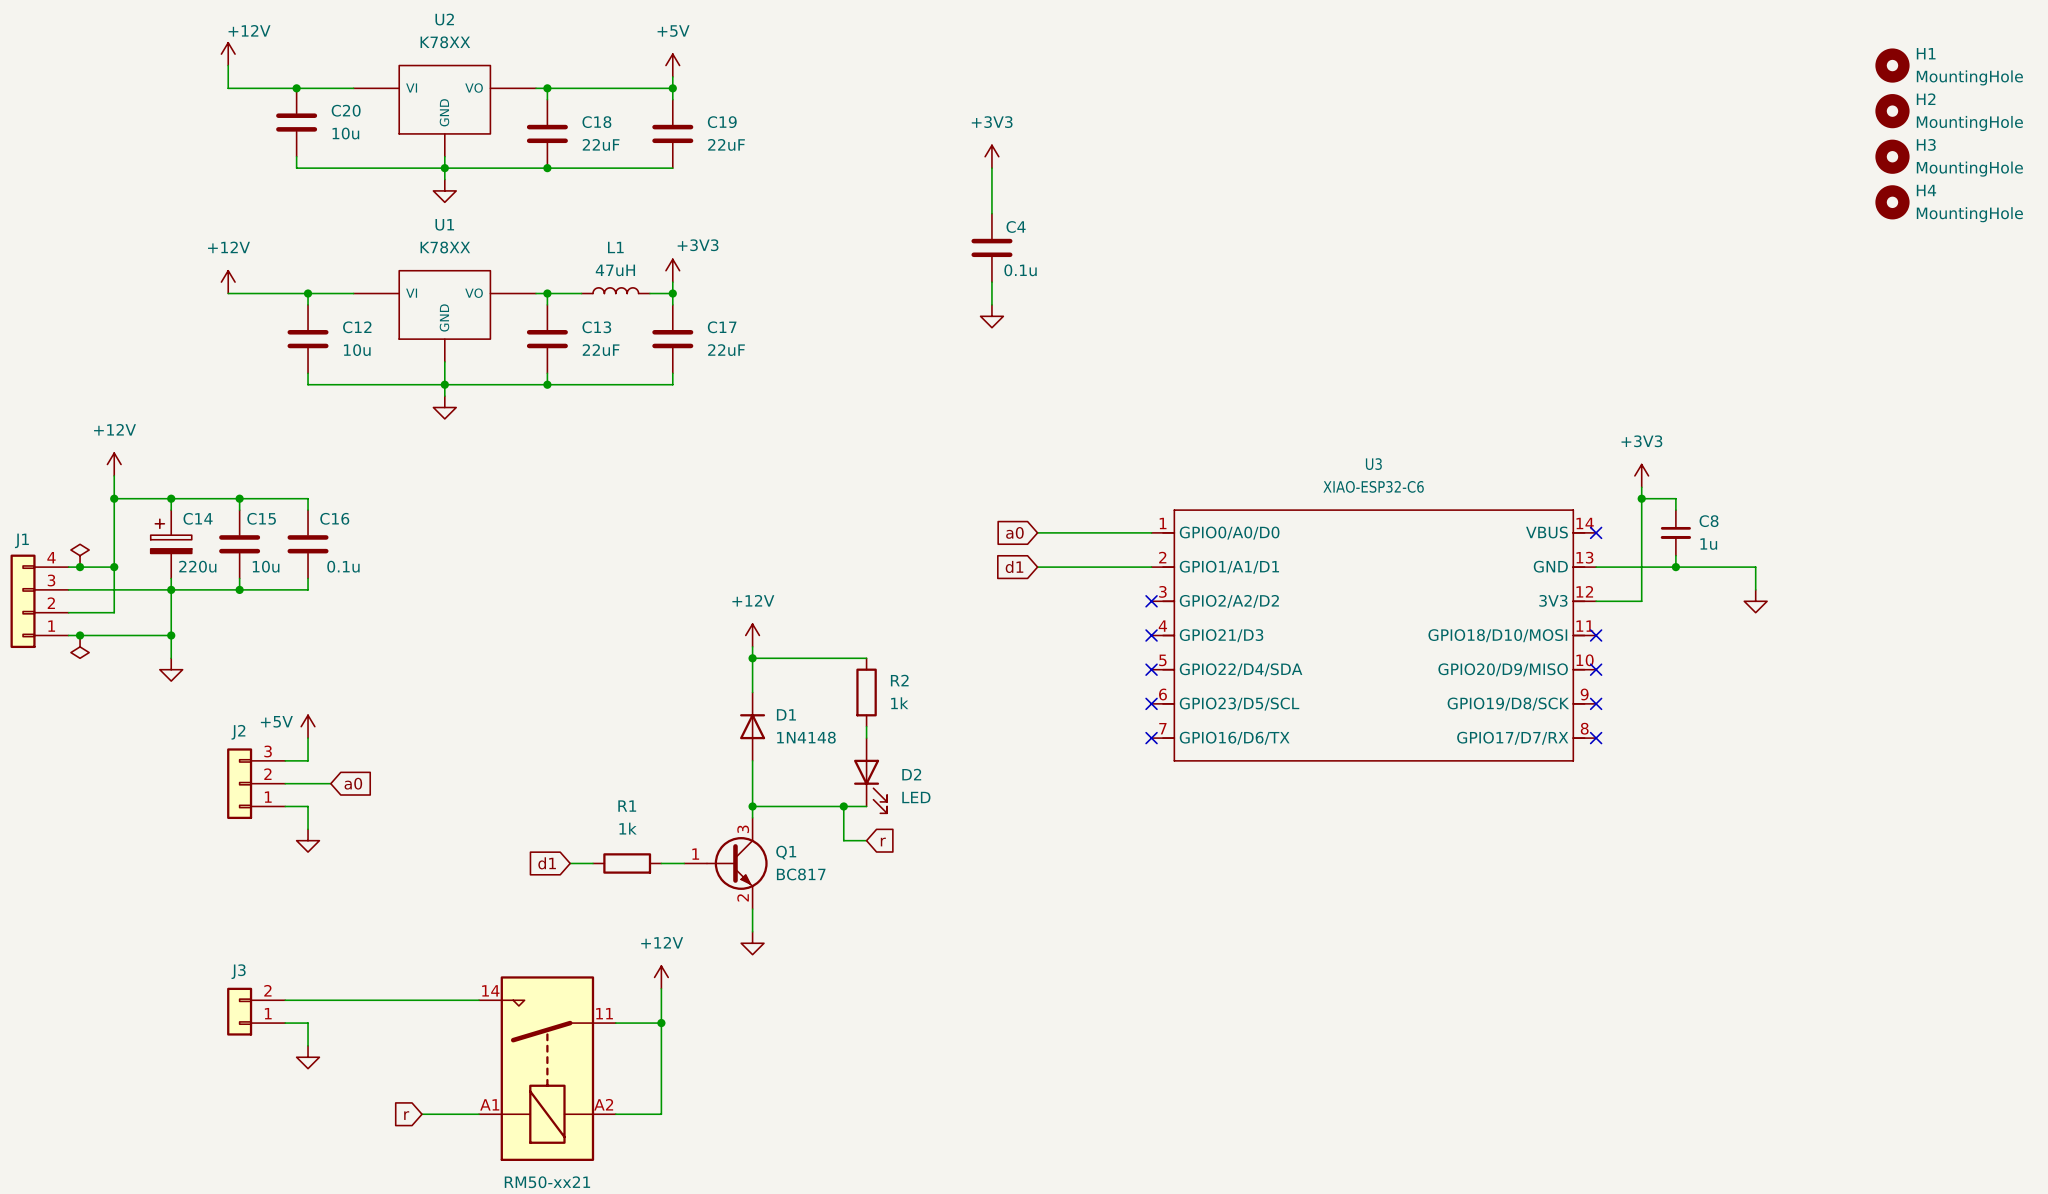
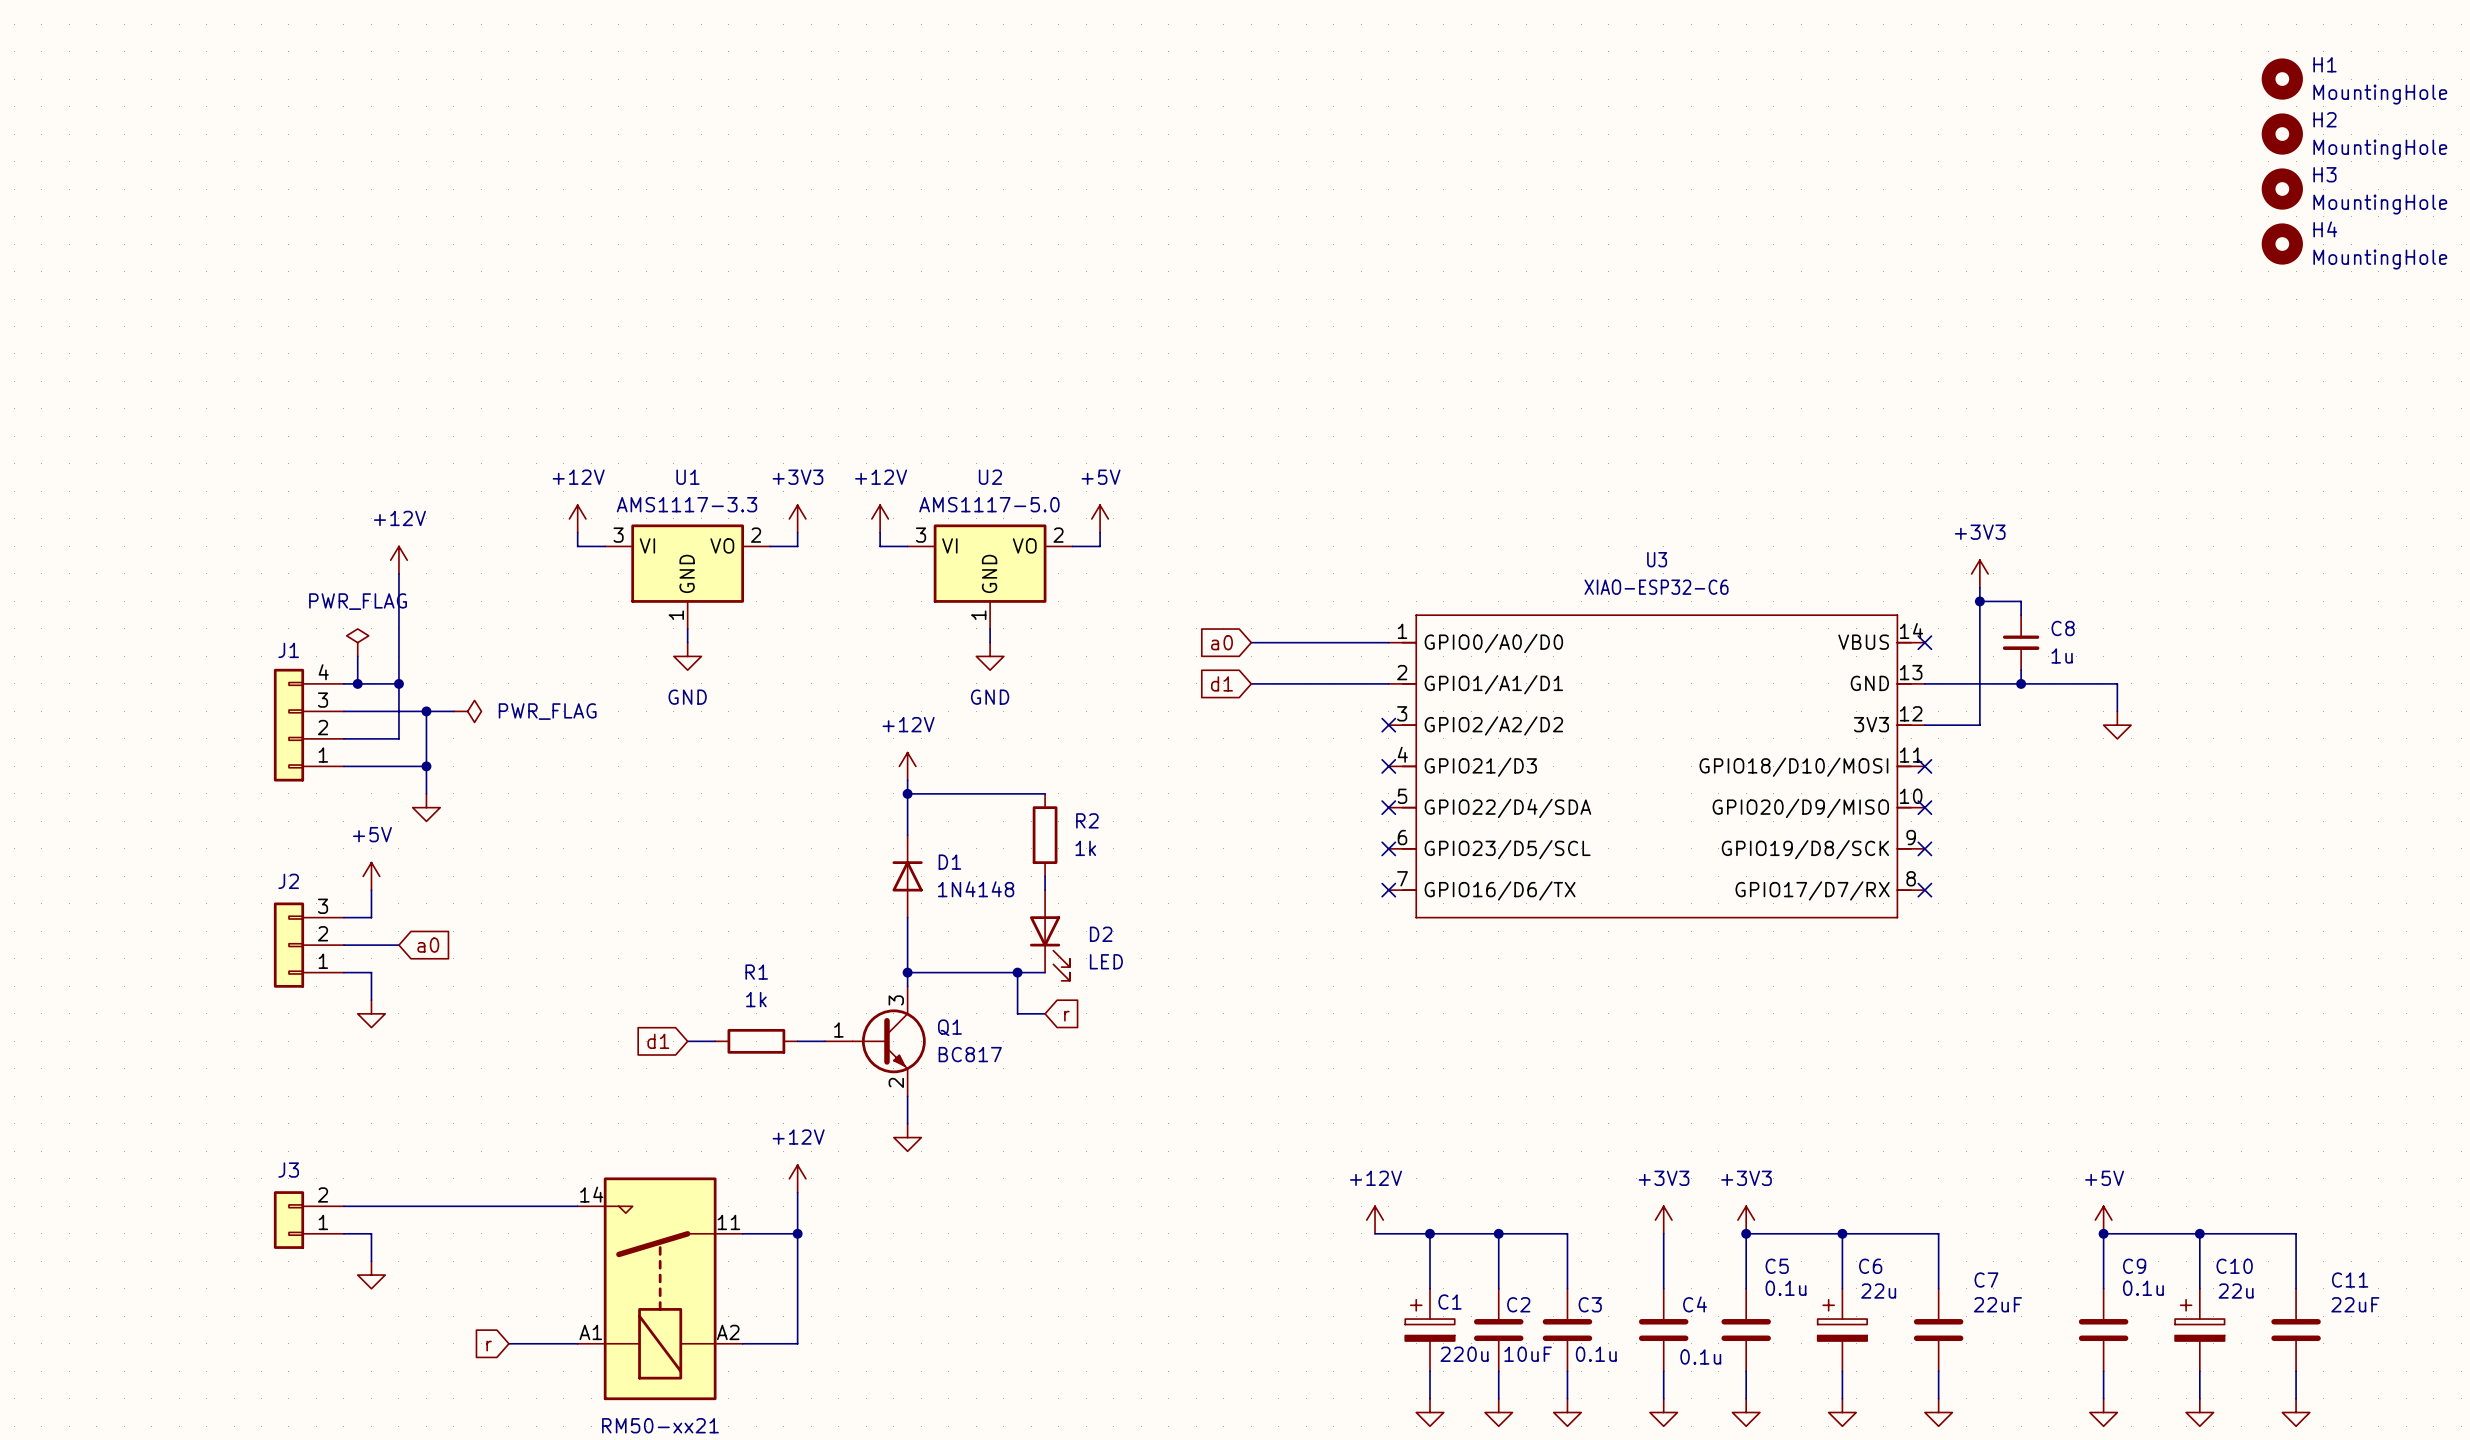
U2 value: K78XX (445, 42) -> AMS1117-5.0 (989, 504)
power symbol: +12V (228, 54) -> none
wire: (228, 65) (228, 88) (353, 88) -> none
U2 symbol: [353, 65, 537, 157] -> [907, 524, 1073, 629]
power symbol: +5V (672, 65) -> none
wire: (672, 76) (672, 99) -> none
junction: (296, 88) -> none
wire: (536, 88) (672, 88) -> none
wire: (547, 88) (547, 99) -> none
junction: (547, 88) -> none
junction: (672, 88) -> none
C20: 10u (296, 122) -> none
C18: 22uF (547, 133) -> none
C19: 22uF (672, 133) -> none
wire: (296, 156) (296, 168) (672, 168) -> none
wire: (444, 156) (444, 179) -> none
power symbol: +3V3 (991, 156) -> none
junction: (444, 168) -> none
junction: (547, 168) -> none
wire: (991, 168) (991, 213) -> none
power symbol: (444, 190) -> none
power symbol text position: +3V3 (698, 245) -> +3V3 (797, 477)
U1 value: K78XX (445, 247) -> AMS1117-3.3 (687, 504)
C4 position: (991, 247) -> (1663, 1330)
U1 symbol: [353, 270, 537, 362] -> [605, 524, 771, 629]
power symbol position: +3V3 (672, 270) -> +3V3 (797, 518)
power symbol: +12V (228, 282) -> none
wire: (672, 282) (672, 304) -> none
wire: (991, 282) (991, 304) -> none
L1: 47uH (615, 290) -> none
wire: (228, 293) (353, 293) -> none
wire: (308, 293) (308, 304) -> none
junction: (308, 293) -> none
wire: (536, 293) (581, 293) -> none
wire: (547, 293) (547, 304) -> none
junction: (547, 293) -> none
wire: (649, 293) (672, 293) -> none
junction: (672, 293) -> none
power symbol: (991, 316) -> none
C12: 10u (308, 339) -> none
C13: 22uF (547, 339) -> none
C17: 22uF (672, 339) -> none
wire: (444, 361) (444, 396) -> none
wire: (308, 373) (308, 384) (672, 384) (672, 373) -> none
wire: (547, 373) (547, 384) -> (687, 628) (687, 642)
junction: (444, 384) -> none
junction: (547, 384) -> none
power symbol: (444, 407) -> none
power symbol: none -> +12V (577, 518)
power symbol: none -> +12V (880, 518)
power symbol: none -> +5V (1100, 518)
wire: none -> (577, 532) (577, 546) (605, 546)
wire: none -> (797, 532) (797, 546) (770, 546)
wire: none -> (880, 532) (880, 546) (907, 546)
wire: none -> (1100, 532) (1100, 546) (1072, 546)
power symbol: +12V (114, 464) -> none
power symbol: none -> +12V (398, 560)
wire: (114, 475) (114, 612) (68, 612) -> (398, 573) (398, 738) (343, 738)
wire: (114, 498) (308, 498) (308, 510) -> none
junction: (114, 498) -> none
wire: (171, 498) (171, 510) -> none
junction: (171, 498) -> none
wire: (239, 498) (239, 510) -> none
junction: (239, 498) -> none
wire: none -> (990, 628) (990, 642)
power symbol: none -> PWR_FLAG (357, 642)
C14: 220u (171, 544) -> none
C15: 10u (239, 544) -> none
wire: none -> (357, 656) (357, 683)
C16: 0.1u (308, 544) -> none
power symbol: none -> GND (687, 656)
power symbol: none -> GND (990, 656)
power symbol: (80, 555) -> none
wire: (68, 567) (114, 567) -> (343, 683) (398, 683)
junction: (80, 567) -> none
junction: (114, 567) -> none
junction: none -> (357, 683)
junction: none -> (398, 683)
wire: (171, 578) (171, 658) -> none
wire: (308, 578) (308, 589) -> (453, 711) (371, 711)
wire: (68, 589) (285, 589) -> none
junction: (171, 589) -> none
junction: (239, 589) -> none
wire: none -> (426, 711) (426, 793)
junction: none -> (426, 711)
power symbol: none -> PWR_FLAG (467, 711)
J1 position: (39, 601) -> (308, 725)
wire: (68, 635) (171, 635) -> none
junction: (80, 635) -> none
junction: (171, 635) -> none
wire: none -> (343, 766) (426, 766)
junction: none -> (426, 766)
power symbol: (80, 646) -> none
power symbol: (171, 669) -> none
power symbol: none -> (426, 807)
power symbol text position: +5V (276, 721) -> +5V (372, 834)
power symbol: none -> +12V (1375, 1220)
power symbol: none -> +3V3 (1663, 1220)
power symbol: none -> +3V3 (1746, 1220)
power symbol: none -> +5V (2103, 1220)
wire: none -> (1375, 1233) (1567, 1233) (1567, 1288)
wire: none -> (1429, 1233) (1429, 1288)
junction: none -> (1429, 1233)
wire: none -> (1498, 1233) (1498, 1288)
junction: none -> (1498, 1233)
wire: none -> (1663, 1233) (1663, 1288)
junction: none -> (1746, 1233)
wire: none -> (1842, 1233) (1842, 1288)
junction: none -> (1842, 1233)
junction: none -> (2103, 1233)
wire: none -> (2199, 1233) (2199, 1288)
junction: none -> (2199, 1233)
wire: none -> (1746, 1288) (1746, 1233) (1938, 1233) (1938, 1288)
wire: none -> (2103, 1288) (2103, 1233) (2296, 1233) (2296, 1288)
C1: none -> 220u (1429, 1330)
C2: none -> 10uF (1498, 1330)
C3: none -> 0.1u (1567, 1330)
C5: none -> 0.1u (1746, 1330)
C6: none -> 22u (1842, 1330)
C7: none -> 22uF (1938, 1330)
C9: none -> 0.1u (2103, 1330)
C10: none -> 22u (2199, 1330)
C11: none -> 22uF (2296, 1330)
wire: none -> (1429, 1371) (1429, 1398)
wire: none -> (1498, 1371) (1498, 1398)
wire: none -> (1567, 1371) (1567, 1398)
wire: none -> (1663, 1371) (1663, 1398)
wire: none -> (1746, 1371) (1746, 1398)
wire: none -> (1842, 1371) (1842, 1398)
wire: none -> (1938, 1371) (1938, 1398)
wire: none -> (2103, 1371) (2103, 1398)
wire: none -> (2199, 1371) (2199, 1398)
wire: none -> (2296, 1371) (2296, 1398)
power symbol: none -> (1429, 1412)
power symbol: none -> (1498, 1412)
power symbol: none -> (1567, 1412)
power symbol: none -> (1663, 1412)
power symbol: none -> (1746, 1412)
power symbol: none -> (1842, 1412)
power symbol: none -> (1938, 1412)
power symbol: none -> (2103, 1412)
power symbol: none -> (2199, 1412)
power symbol: none -> (2296, 1412)

